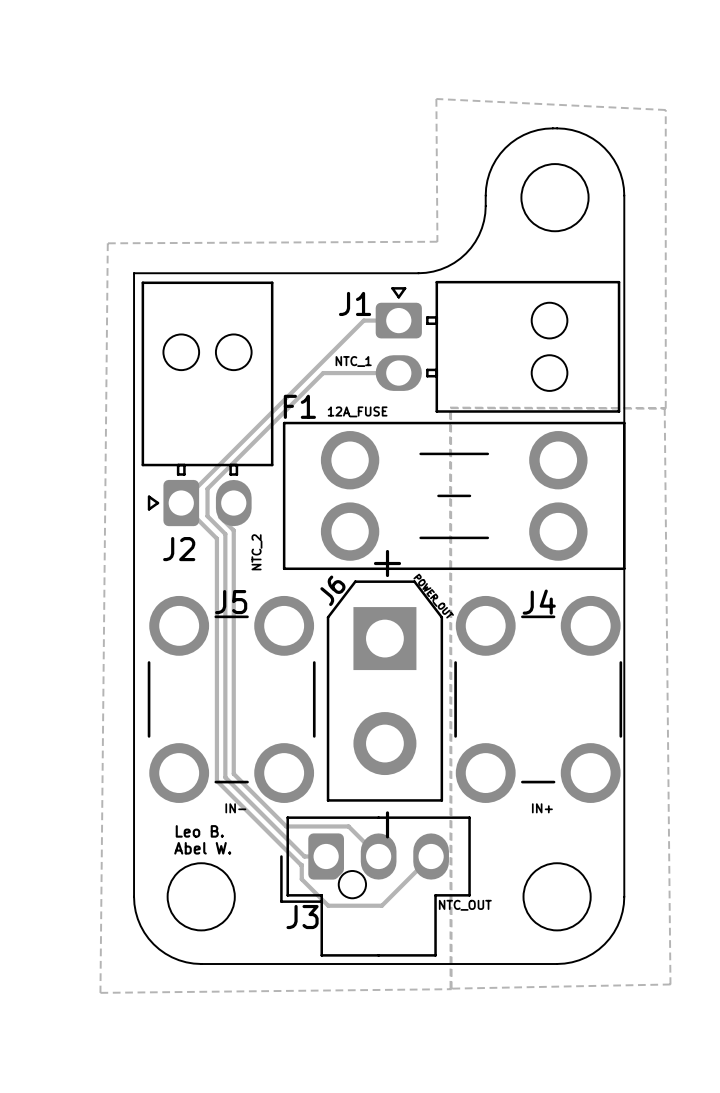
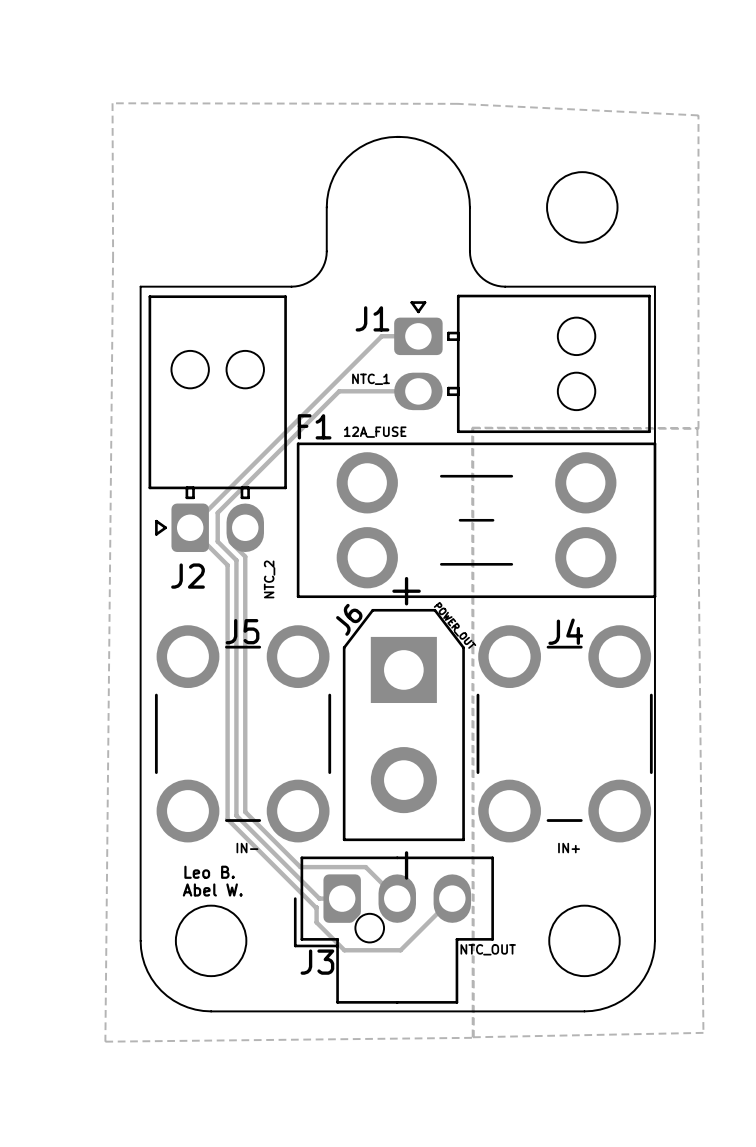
zone outline: (436, 98) (437, 241) (107, 243) -> (457, 103) (112, 103) (113, 255)
board edge: (277, 273) (418, 273) (433, 271) (447, 266) (466, 253) (479, 235) (485, 213) (487, 180) (492, 166) (500, 153) (511, 143) (523, 135) (537, 130) (552, 128) (572, 130) (592, 138) (609, 153) (617, 166) (623, 188) (624, 273) -> (291, 286) (303, 284) (313, 278) (324, 263) (326, 251) (327, 199) (330, 184) (337, 169) (353, 152) (366, 143) (381, 138) (397, 136) (415, 138) (430, 143) (449, 157) (459, 169) (465, 184) (469, 199) (470, 259) (475, 270) (486, 281) (505, 286) (654, 286)

